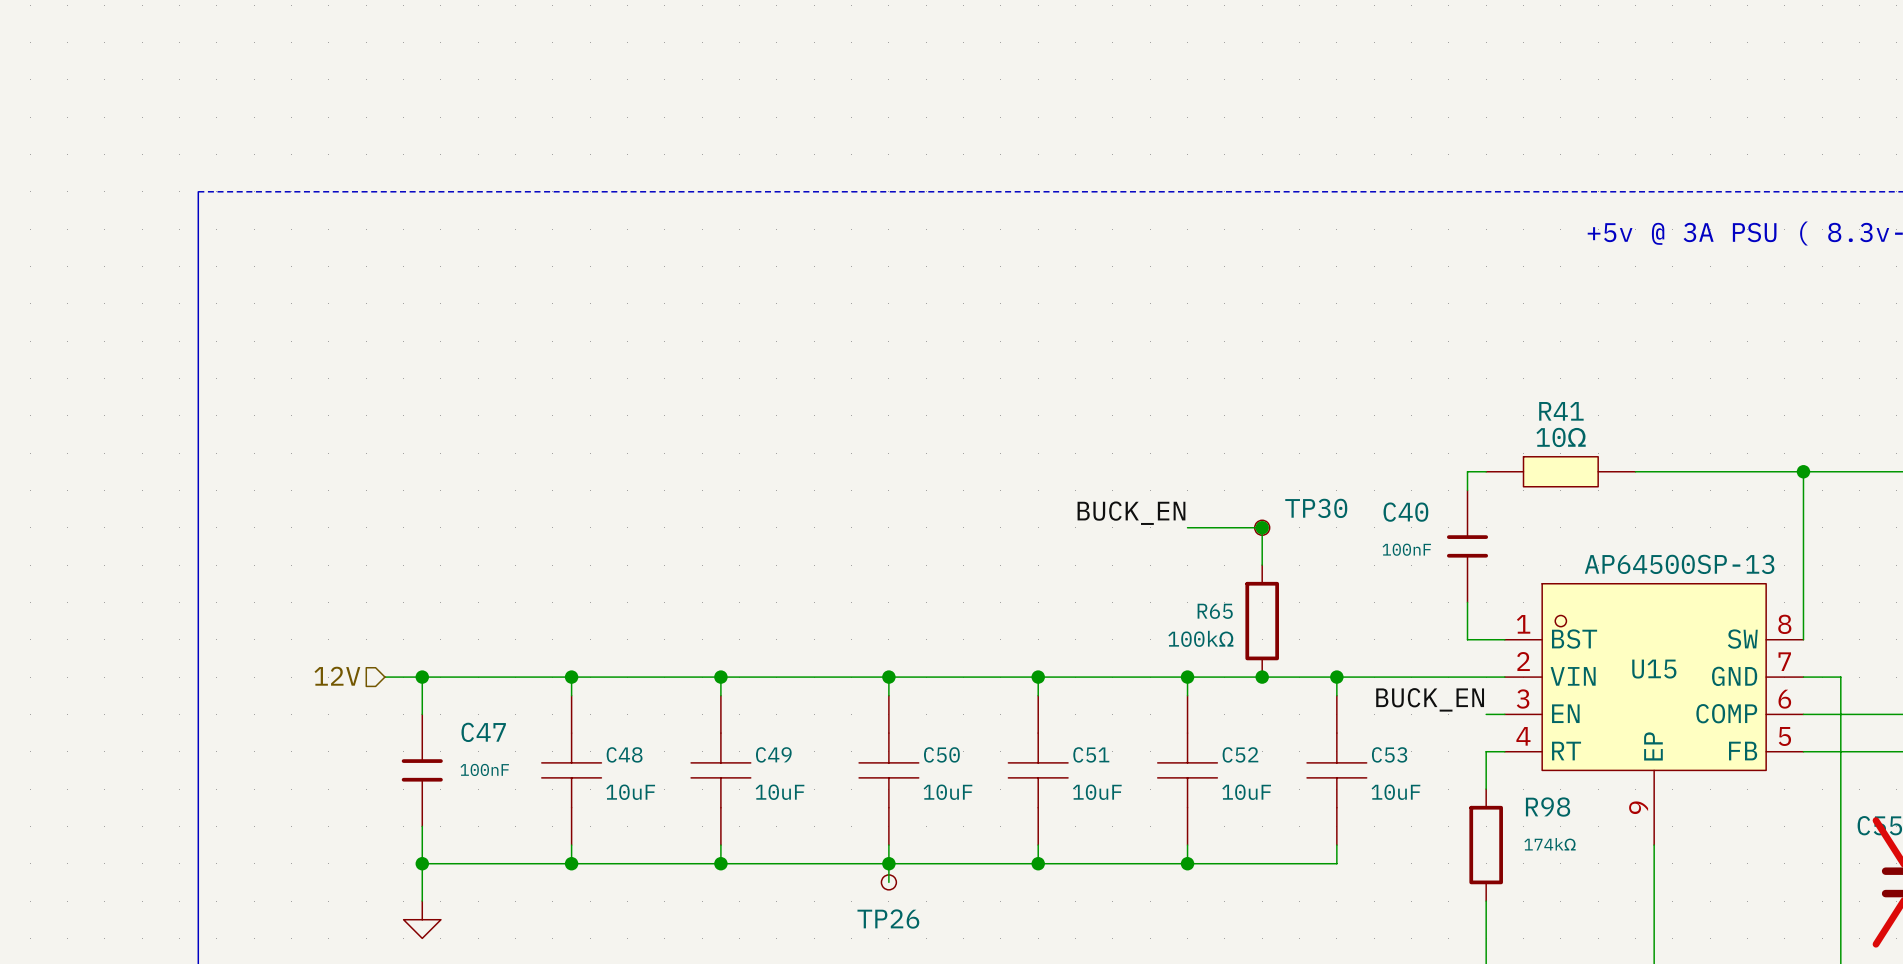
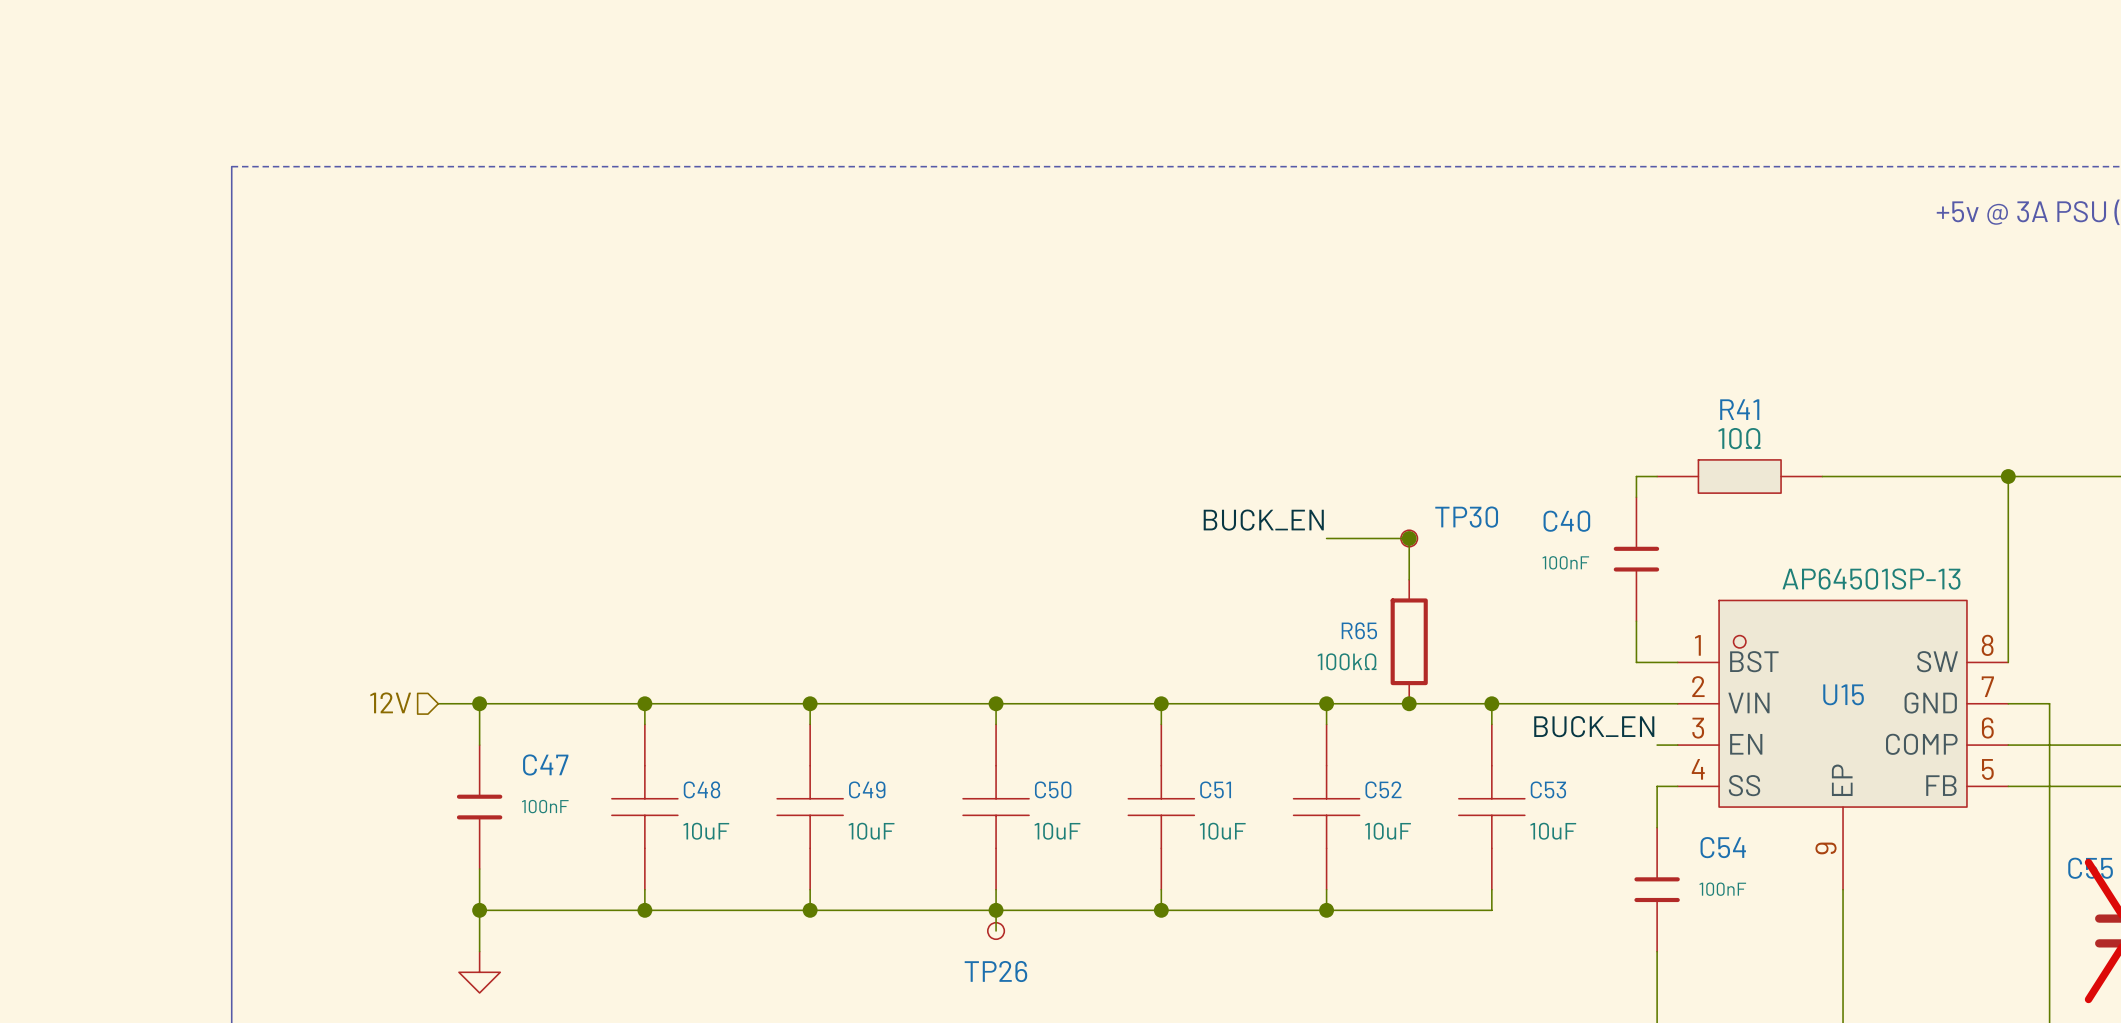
U15 value: AP64500SP-13 (1679, 564) -> AP64501SP-13 (1871, 579)
U15 pin name: RT (1566, 751) -> SS (1744, 785)
R98: 174kΩ (1486, 845) -> none
C54: none -> 100nF (1657, 889)

